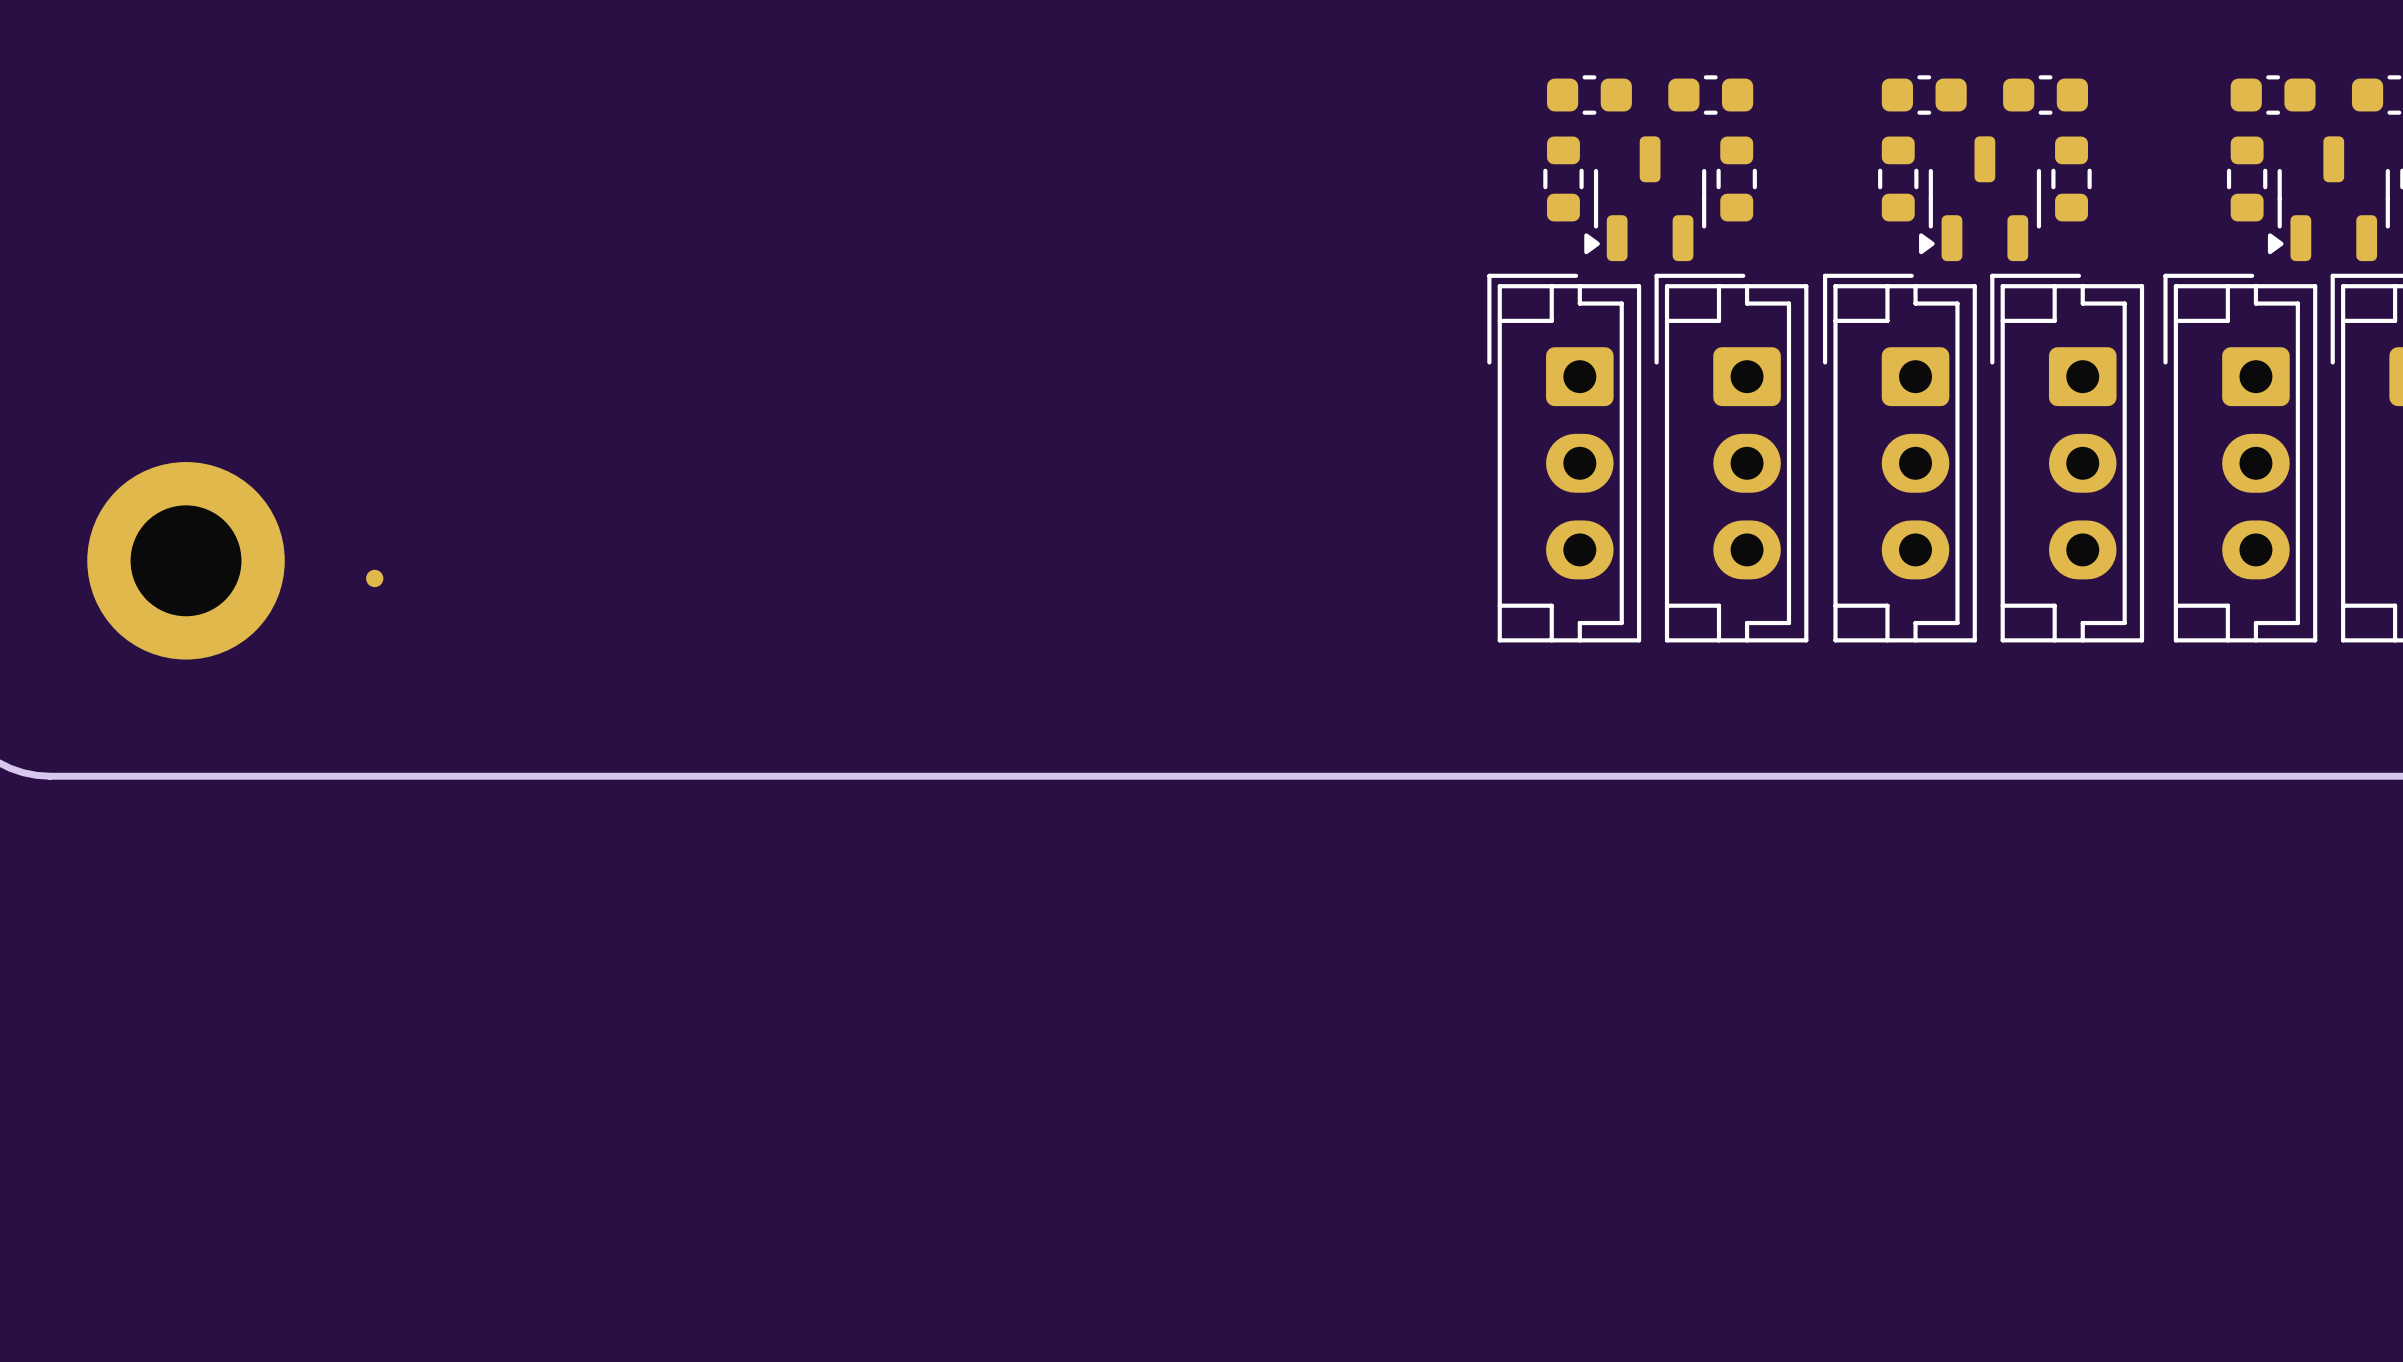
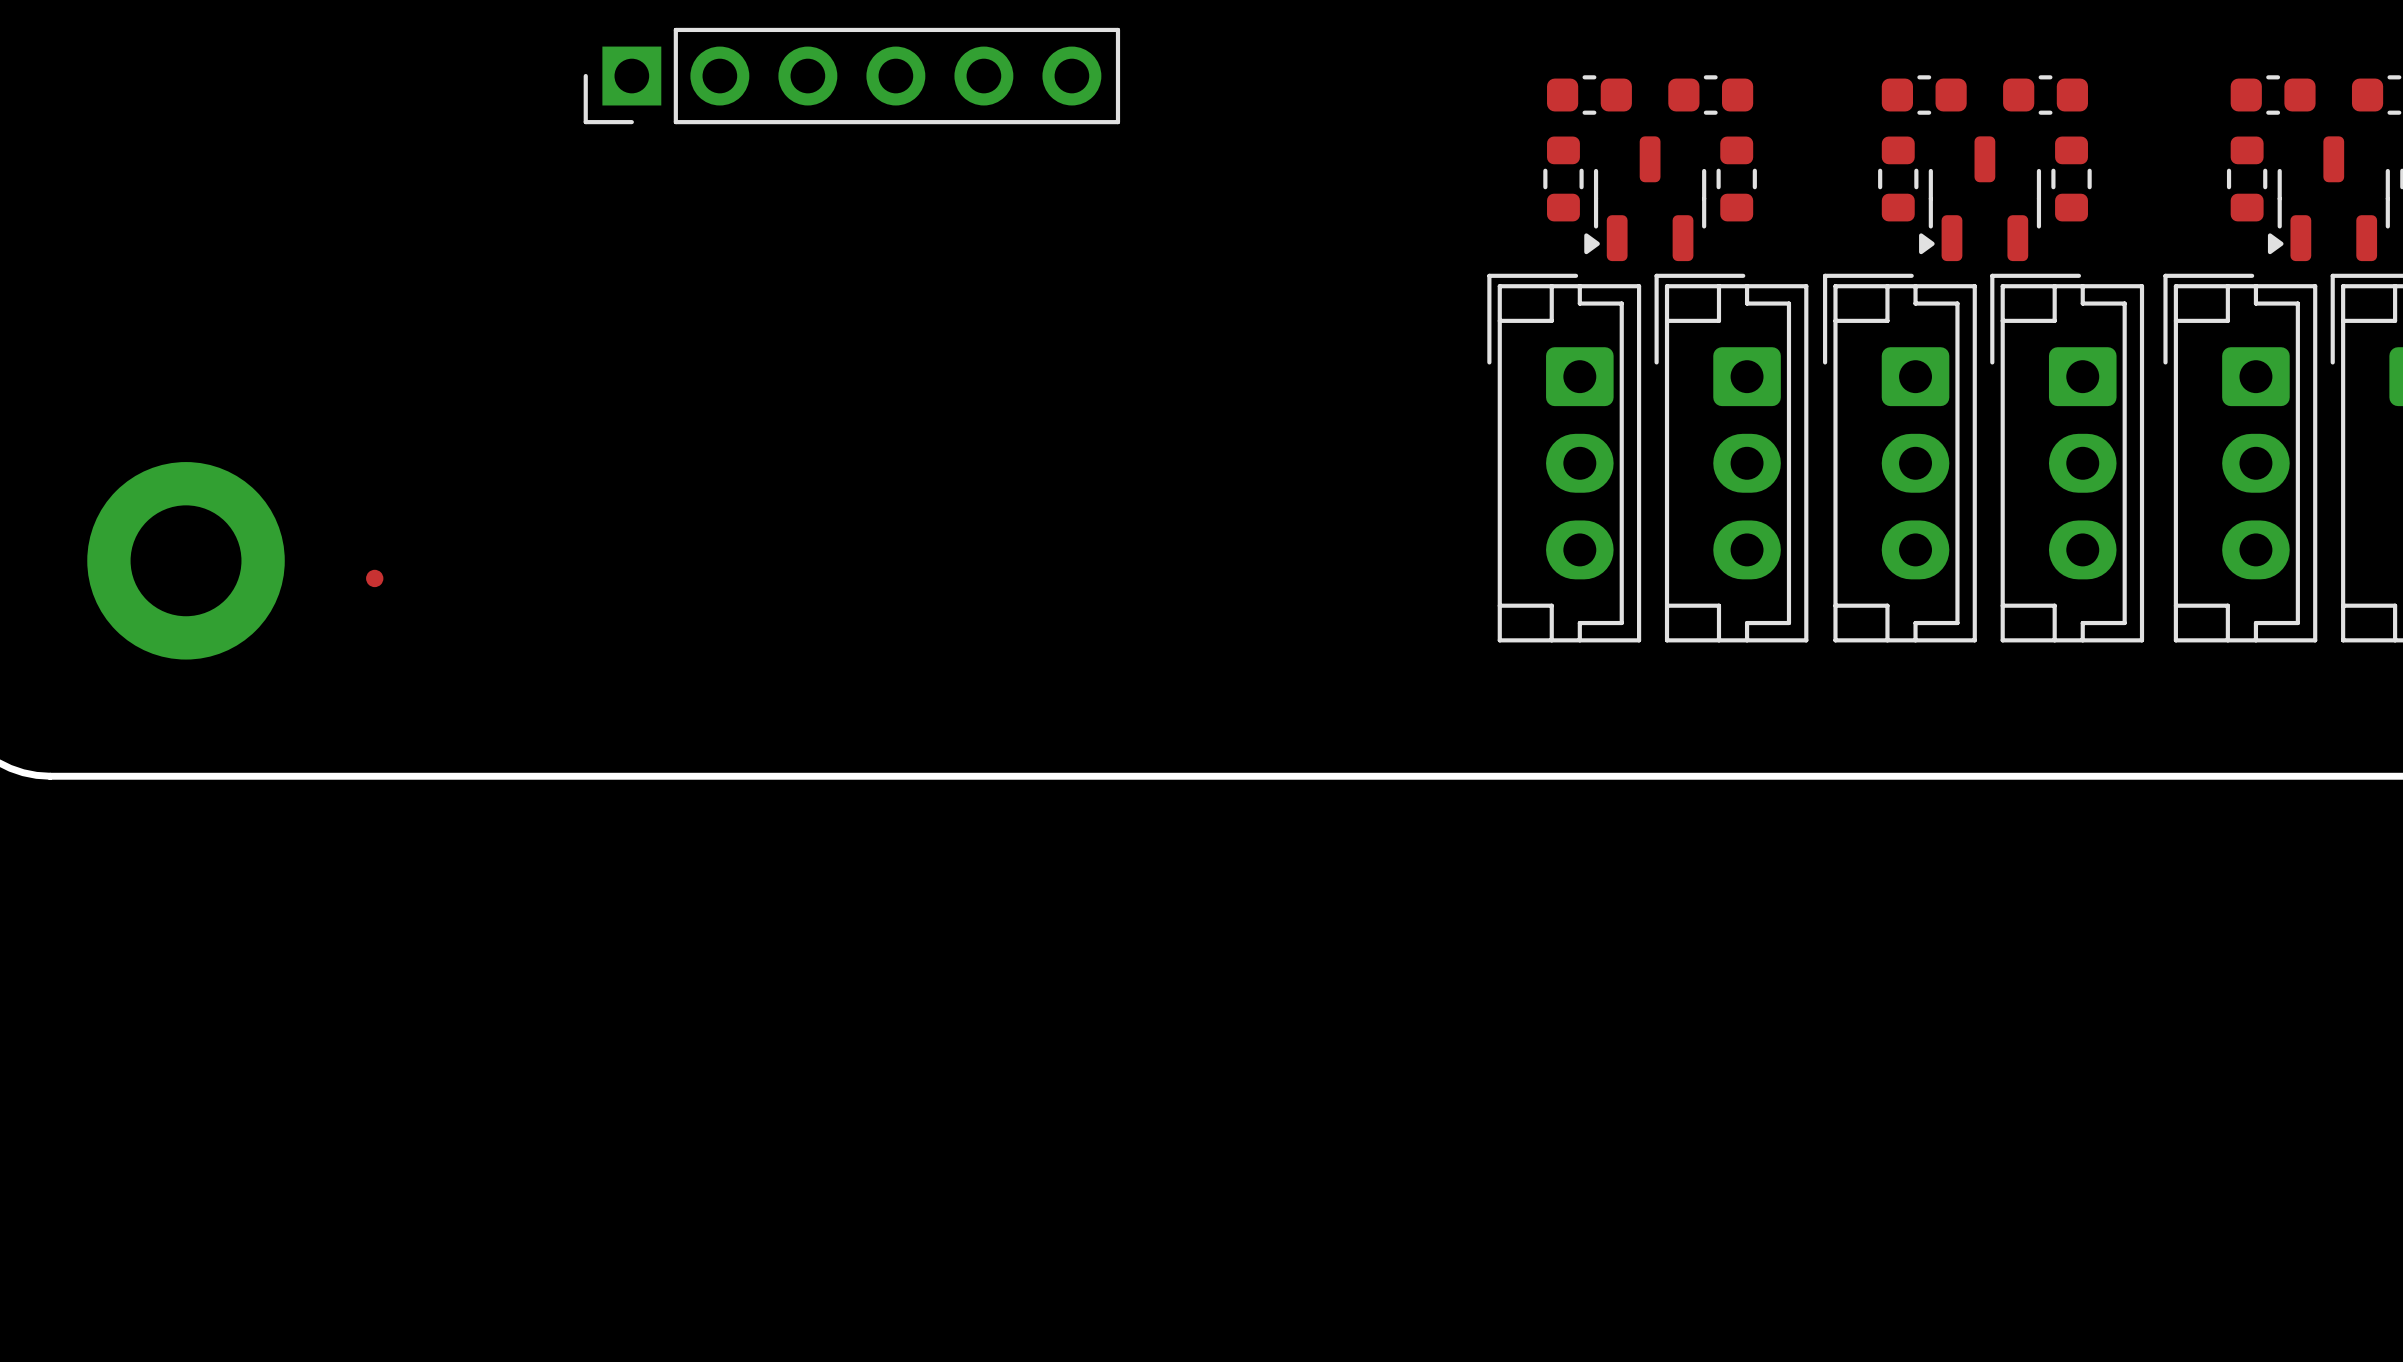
part: none -> (851, 76)

